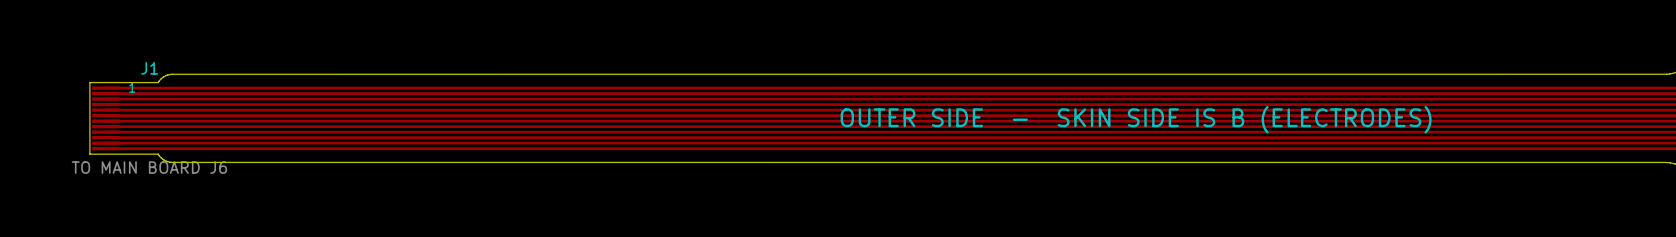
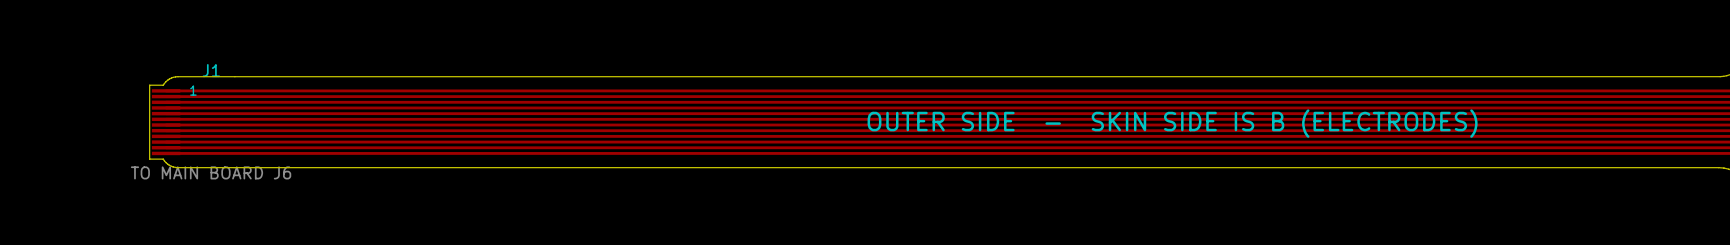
board edge: (144, 82) (89, 82) (89, 154) (144, 154) -> (149, 85) (149, 159)
track: (105, 88) (160, 88) -> none
track: (105, 93) (160, 93) -> none
track: (105, 99) (160, 99) -> none
track: (105, 104) (160, 104) -> none
track: (105, 110) (160, 110) -> none
track: (105, 115) (160, 115) -> none
J1 position: (105, 118) -> (166, 122)
track: (105, 121) (160, 121) -> none
track: (105, 126) (160, 126) -> none
track: (105, 132) (160, 132) -> none
track: (105, 137) (160, 137) -> none
track: (105, 143) (160, 143) -> none
track: (105, 148) (160, 148) -> none

